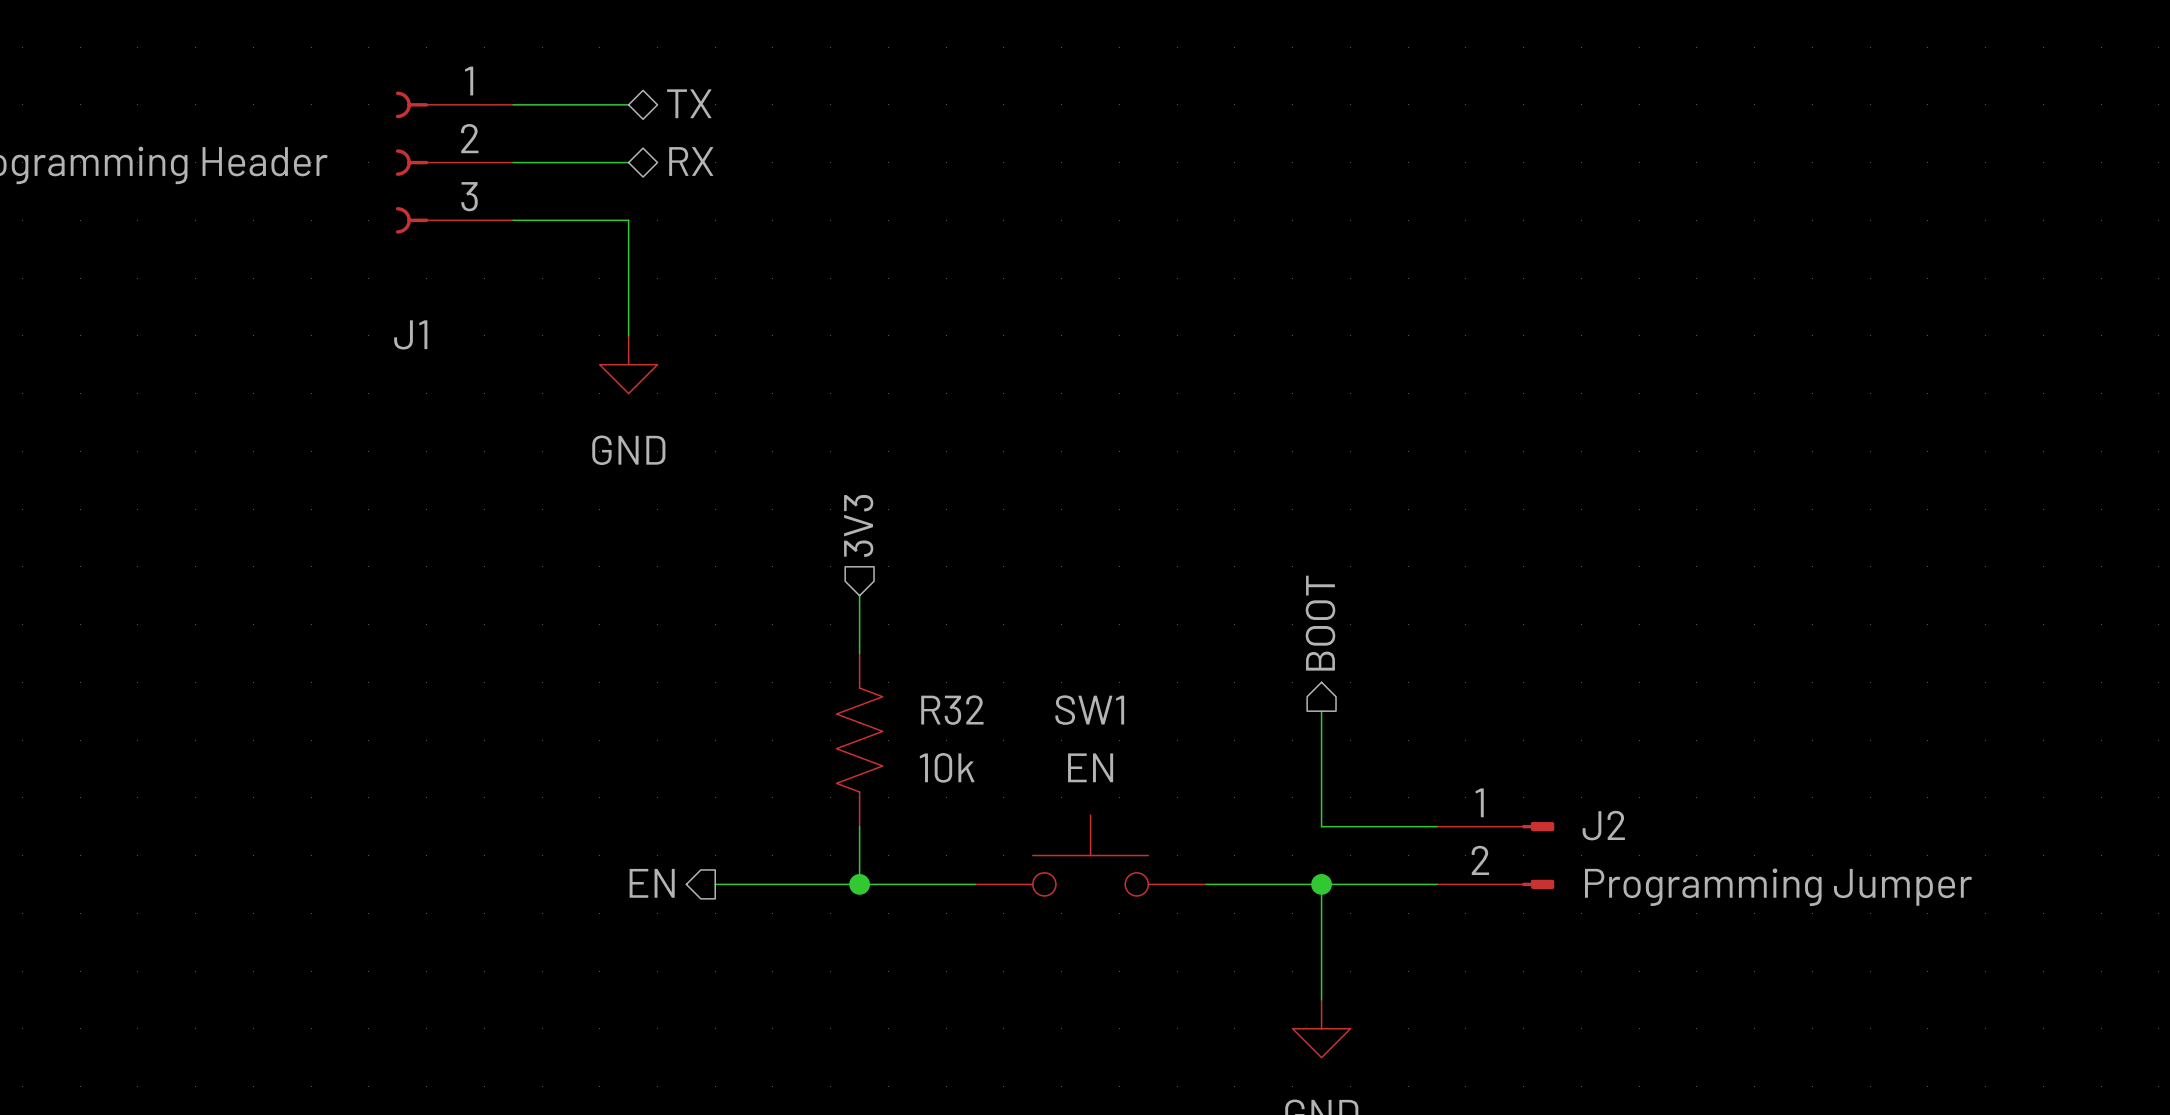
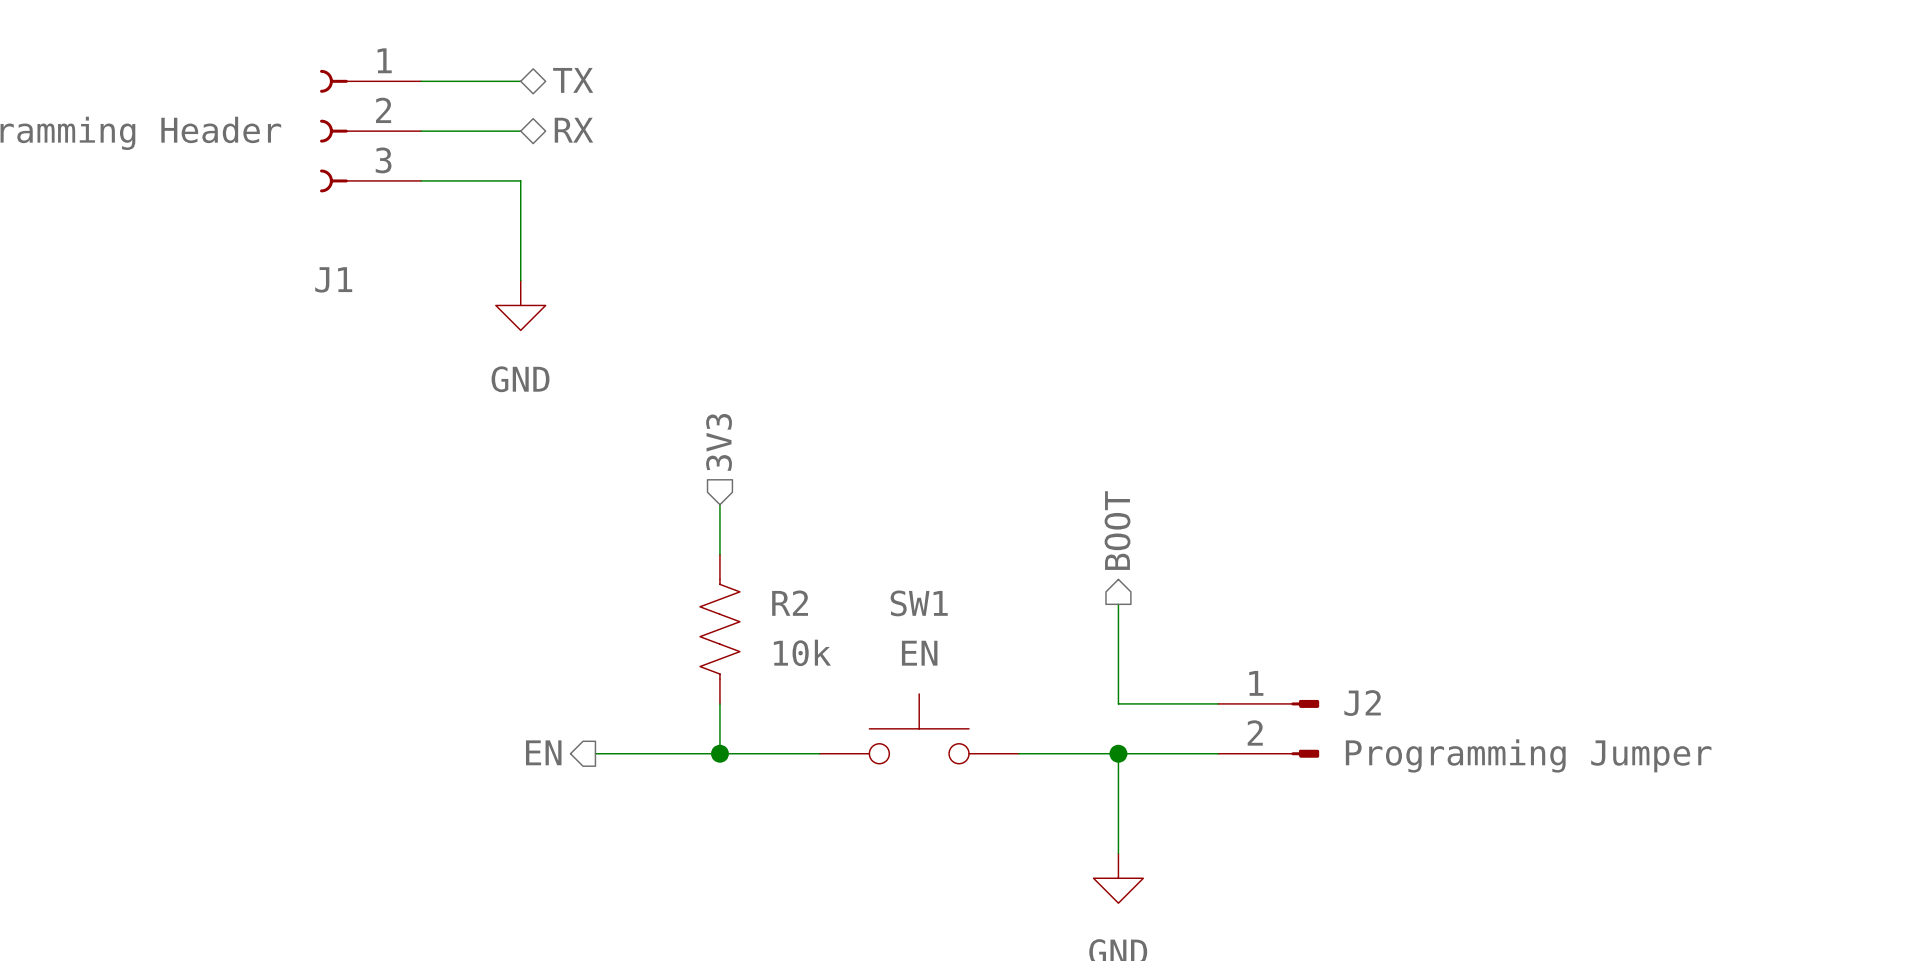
R32 name: R32 (952, 710) -> R2 (790, 603)

